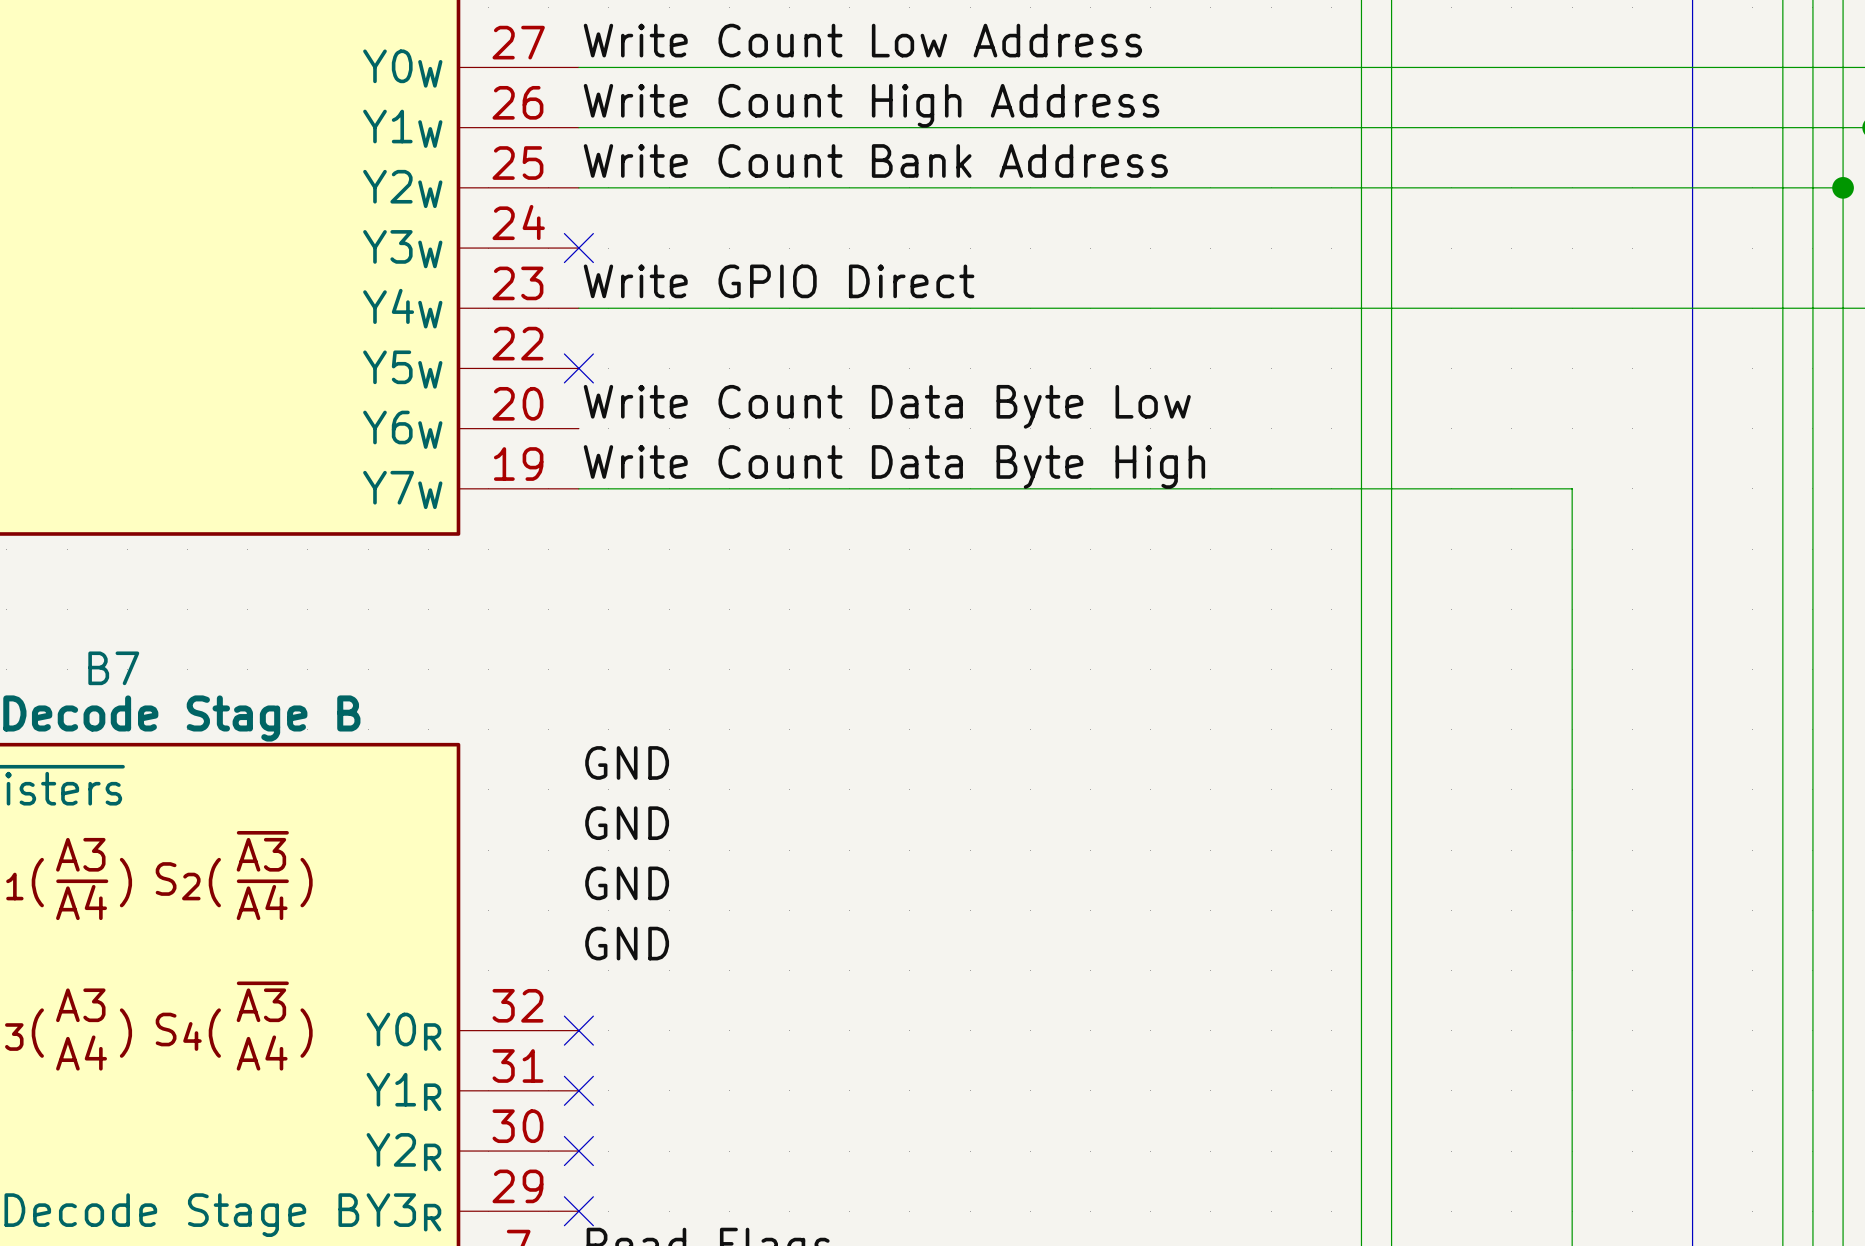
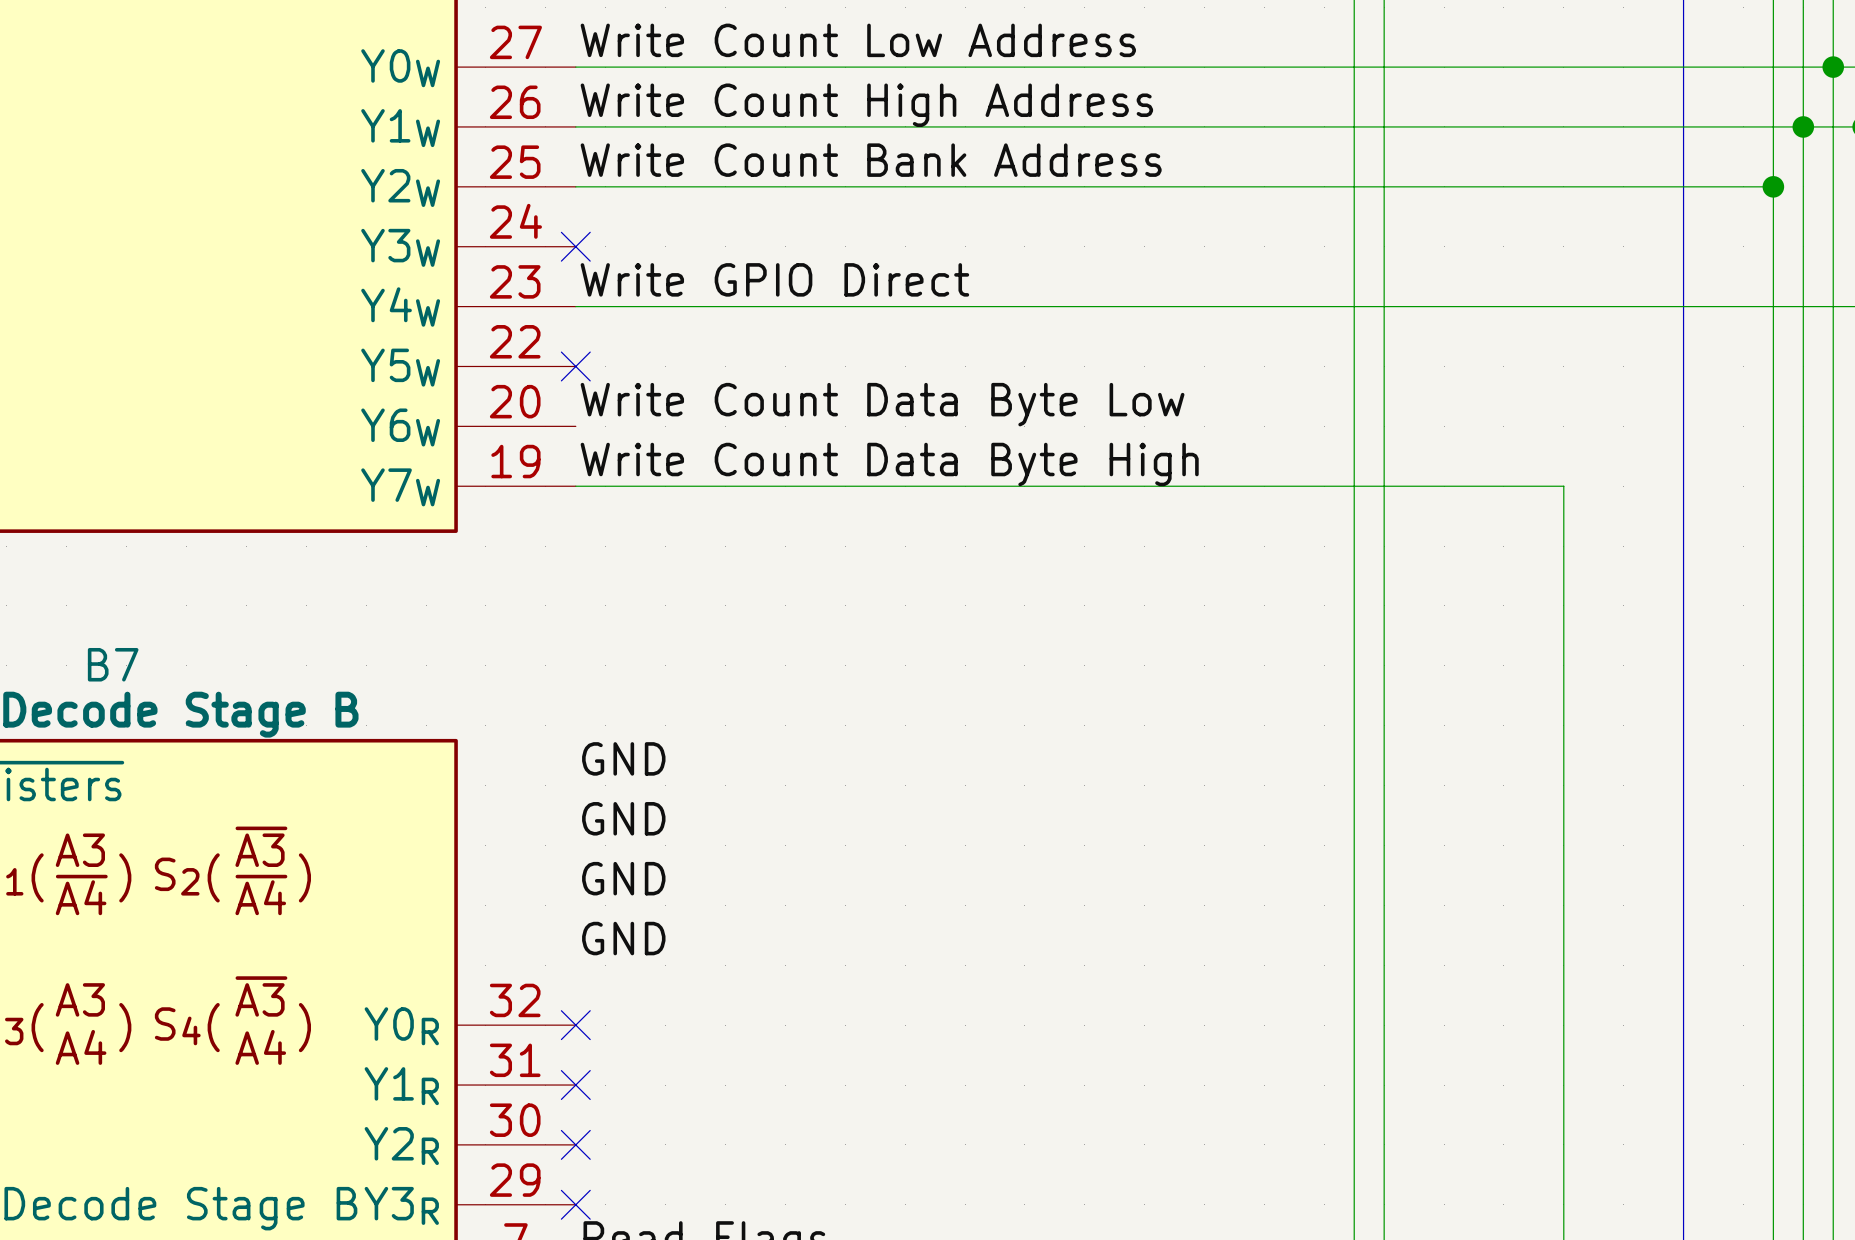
junction: none -> (1833, 67)
junction: none -> (1803, 126)
wire: (1782, 187) (1843, 187) -> none
junction: none -> (1773, 186)
junction: (1843, 187) -> none

